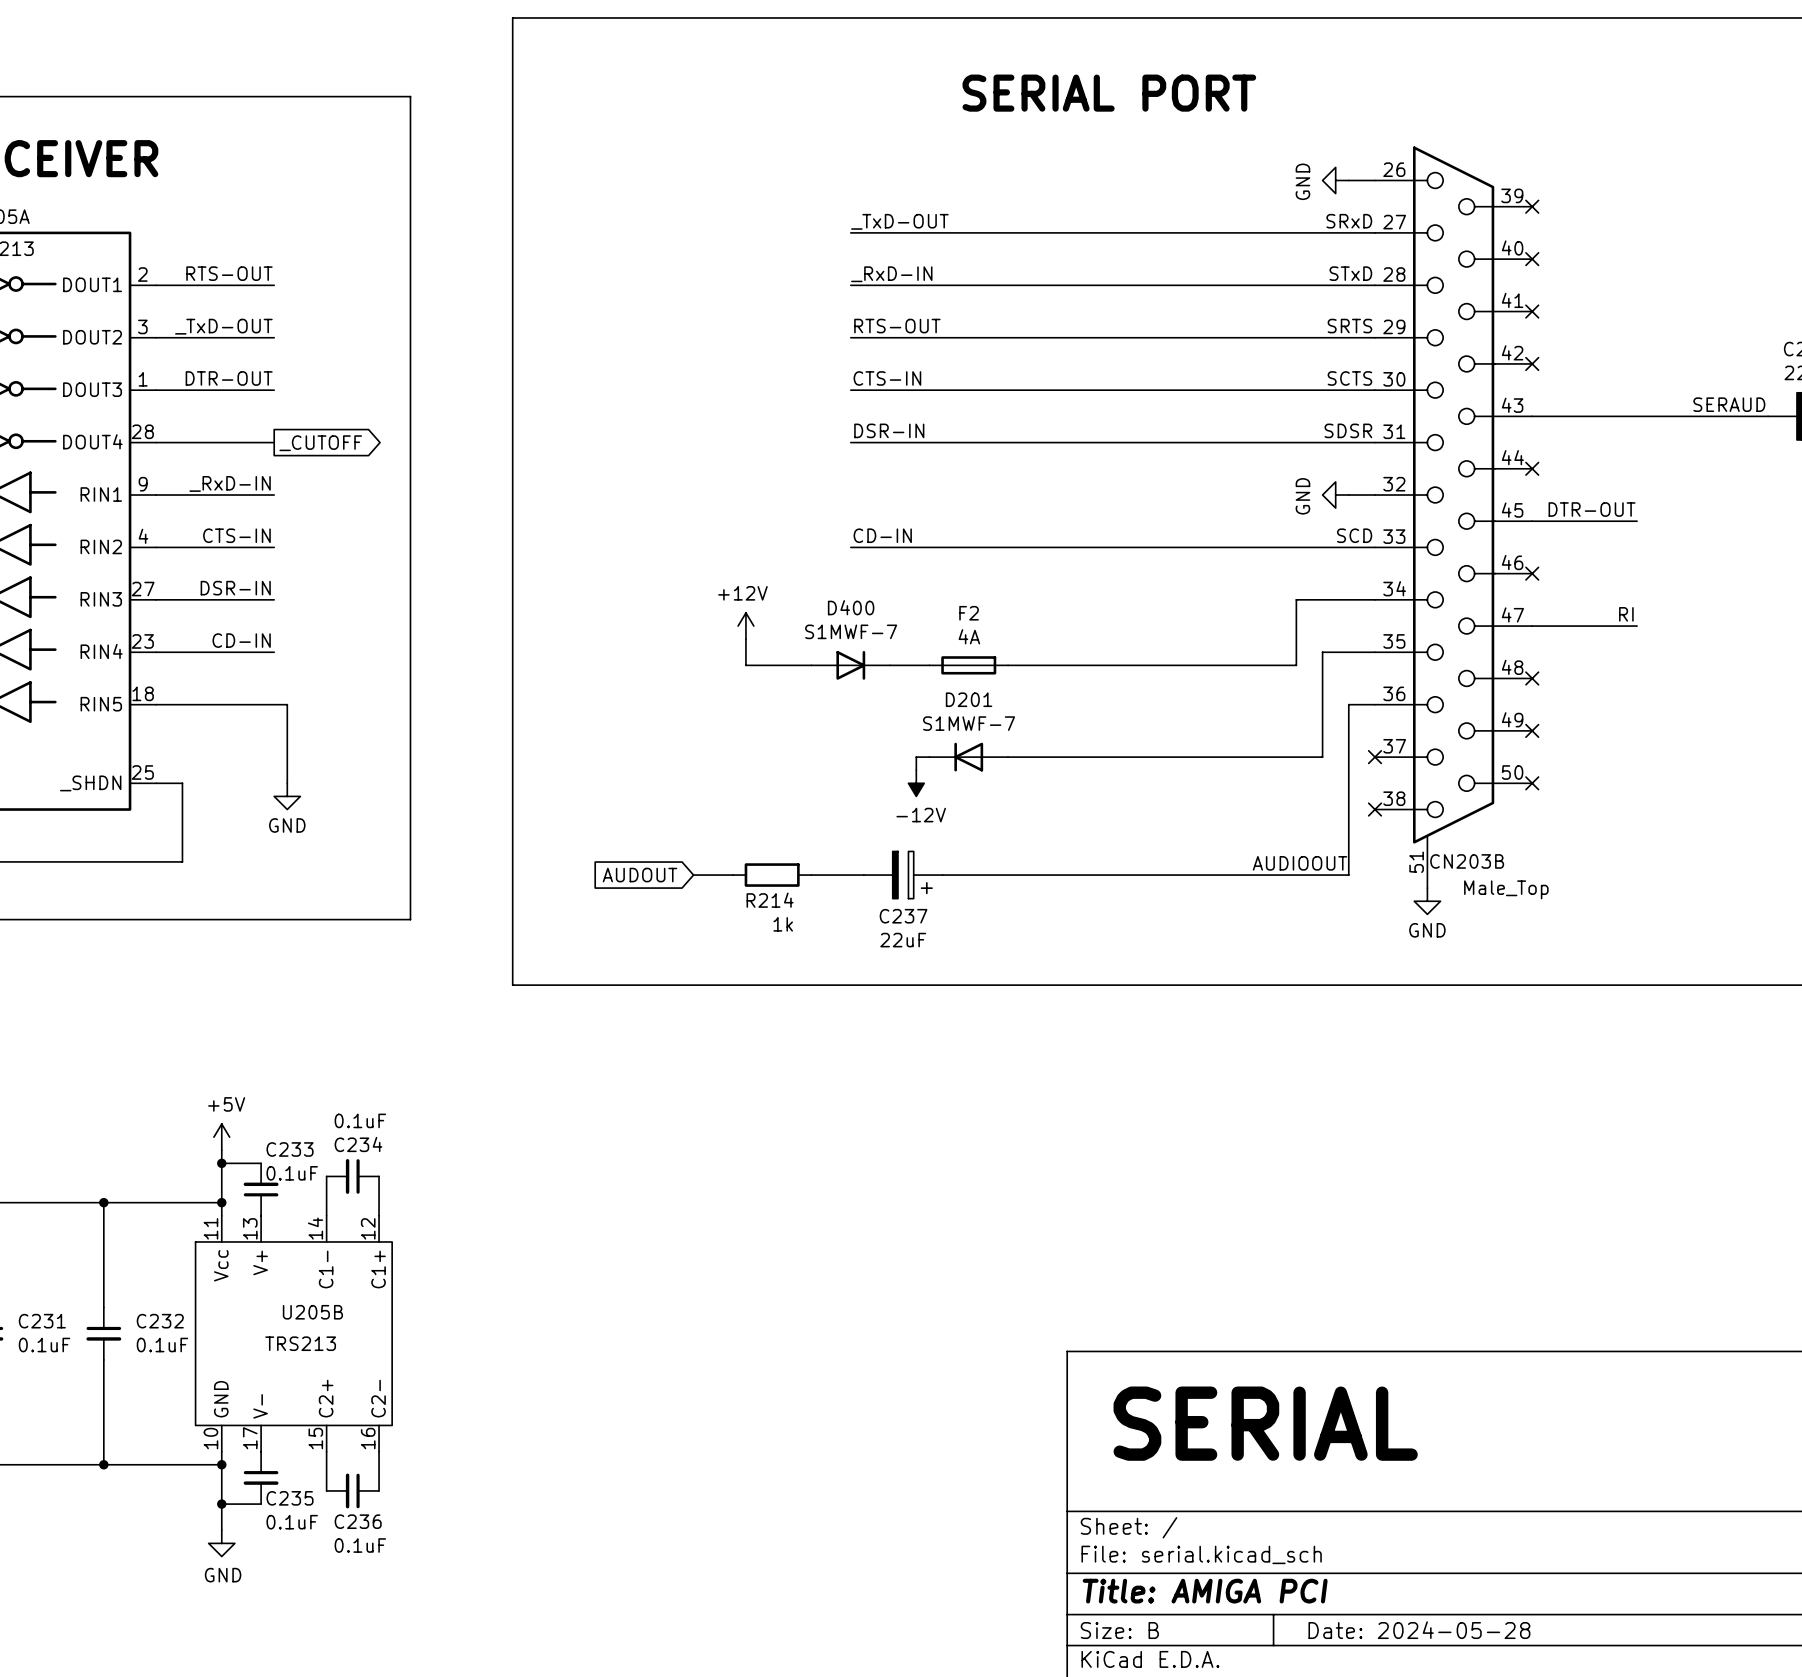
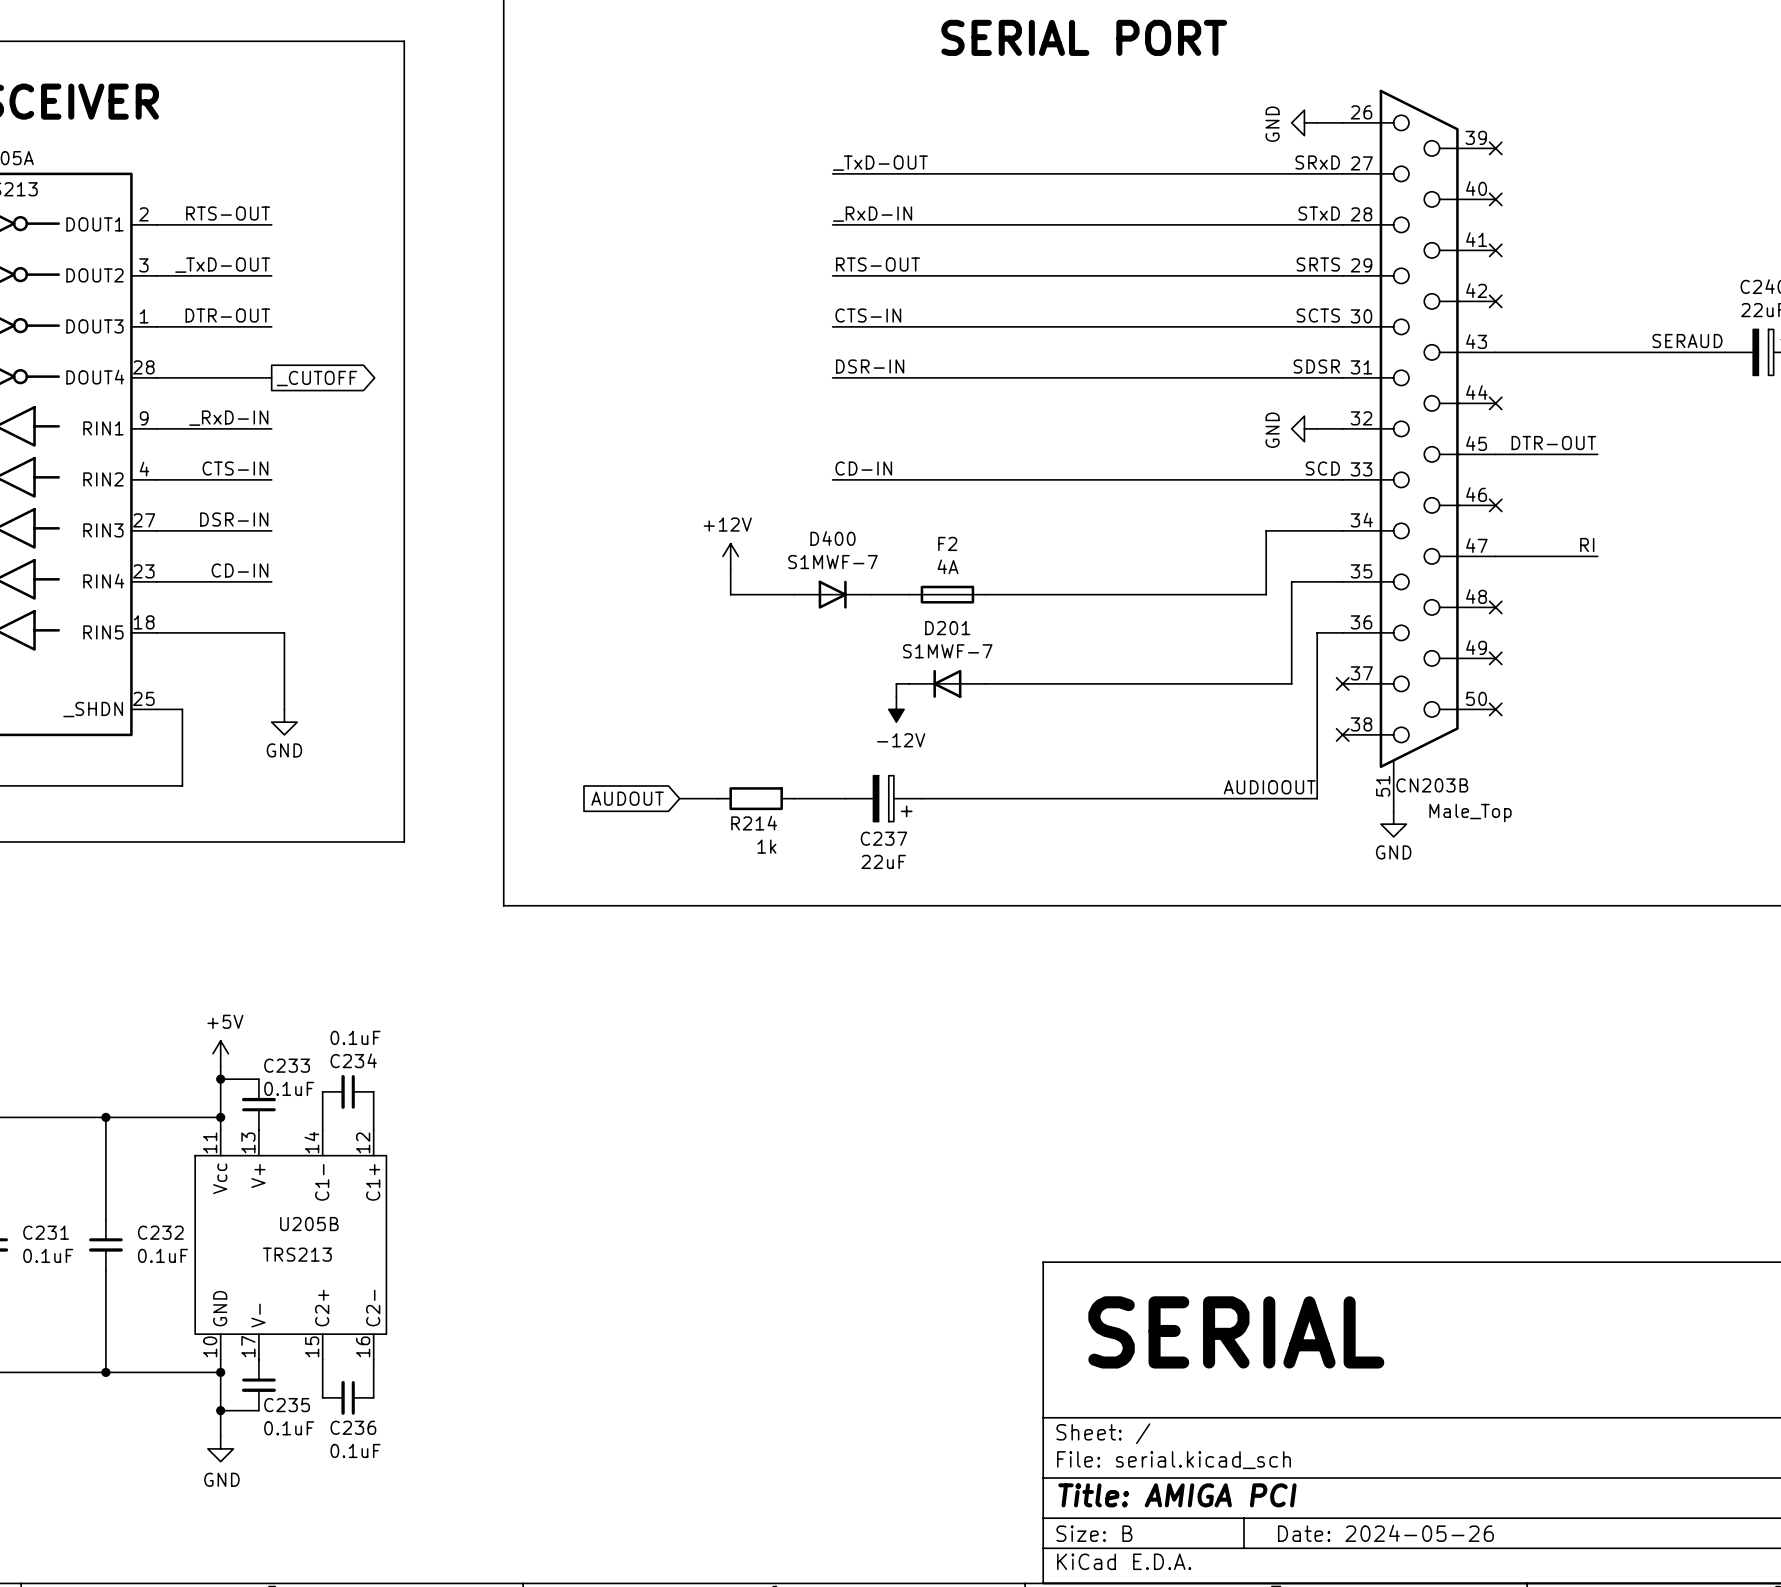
title block: Date: 2024-05-28 (1419, 1630) -> Date: 2024-05-26 (1385, 1533)

